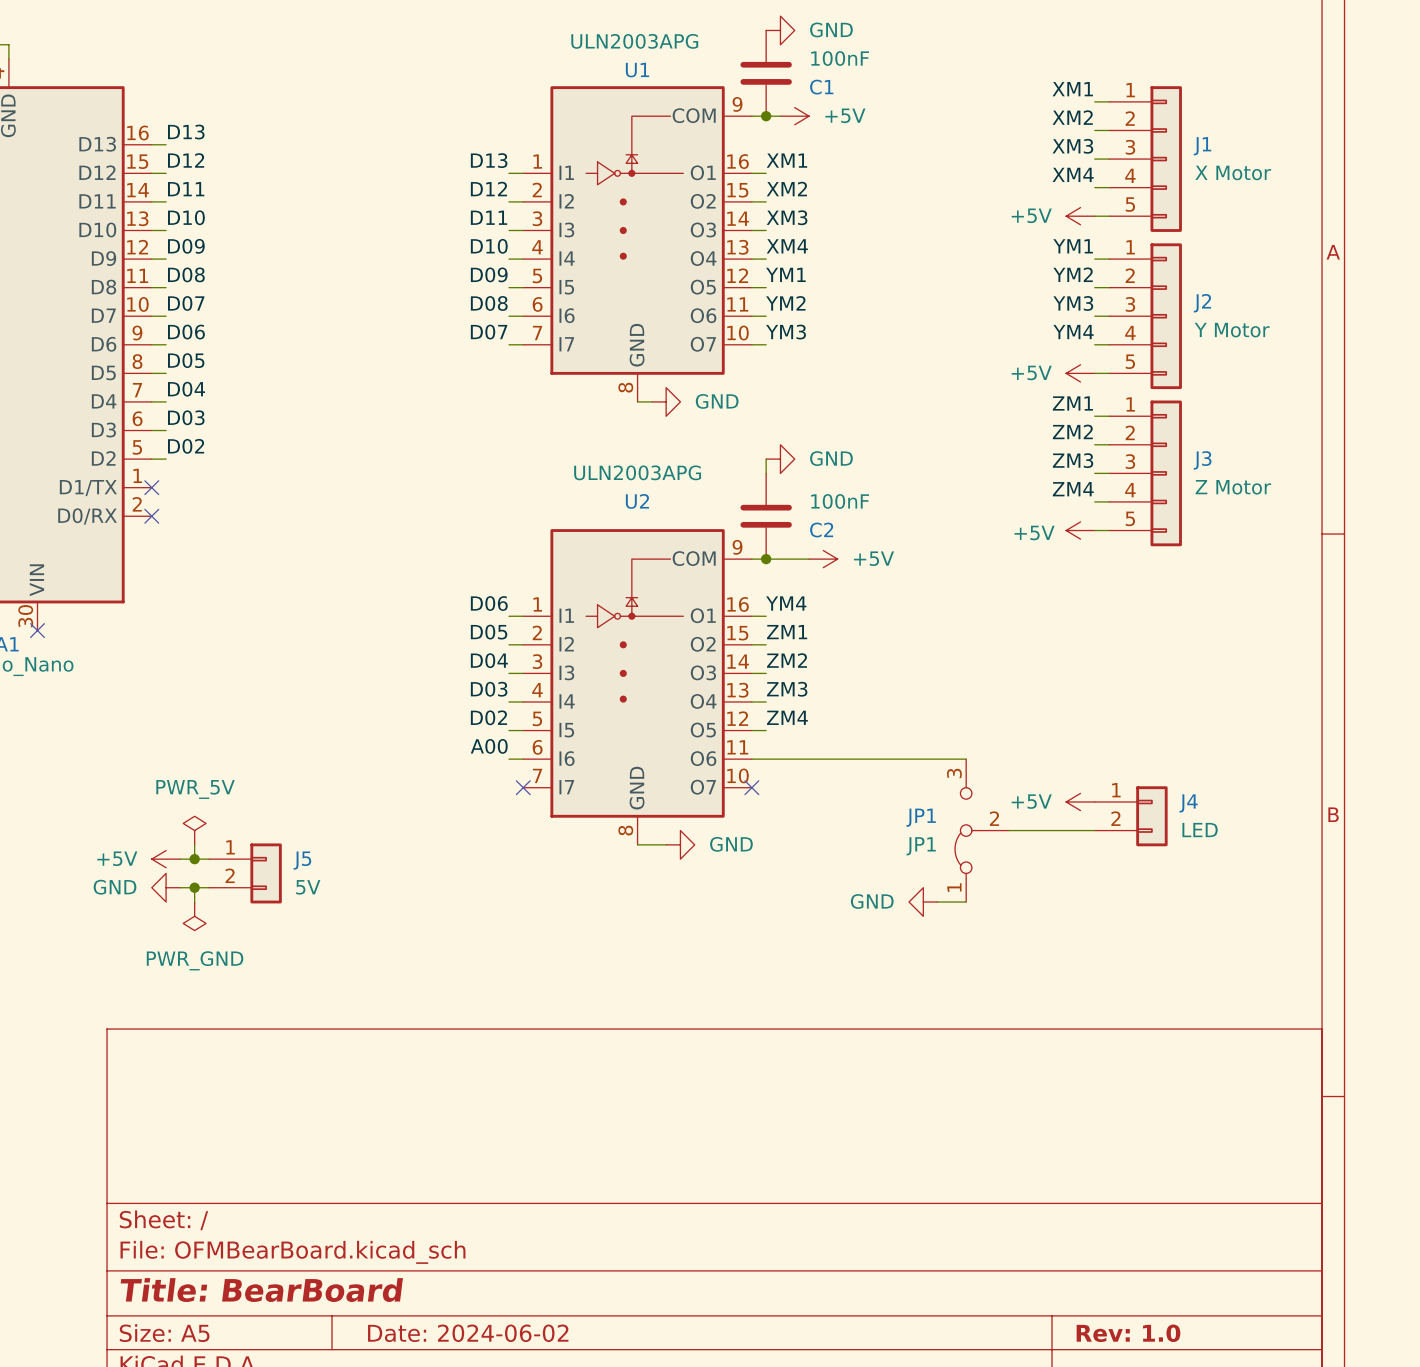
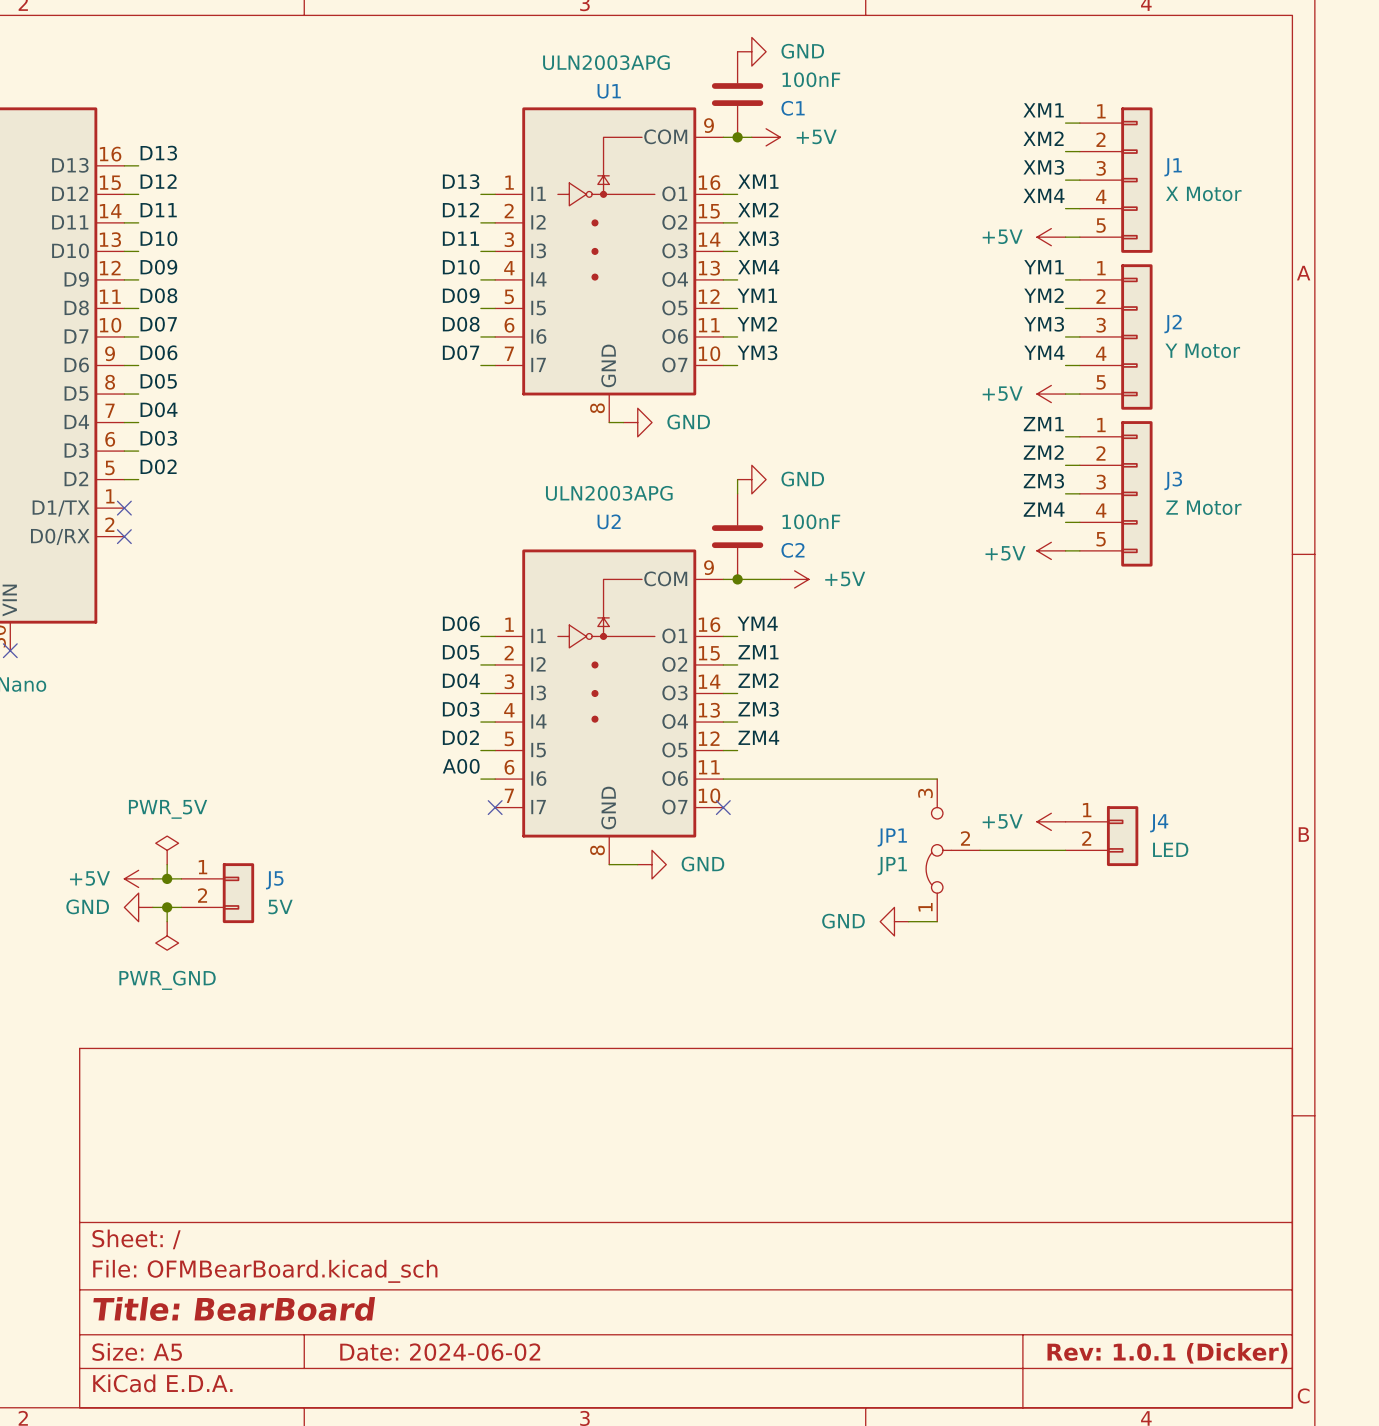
title block: Rev: 1.0 (1128, 1333) -> Rev: 1.0.1 (Dicker) (1167, 1353)

